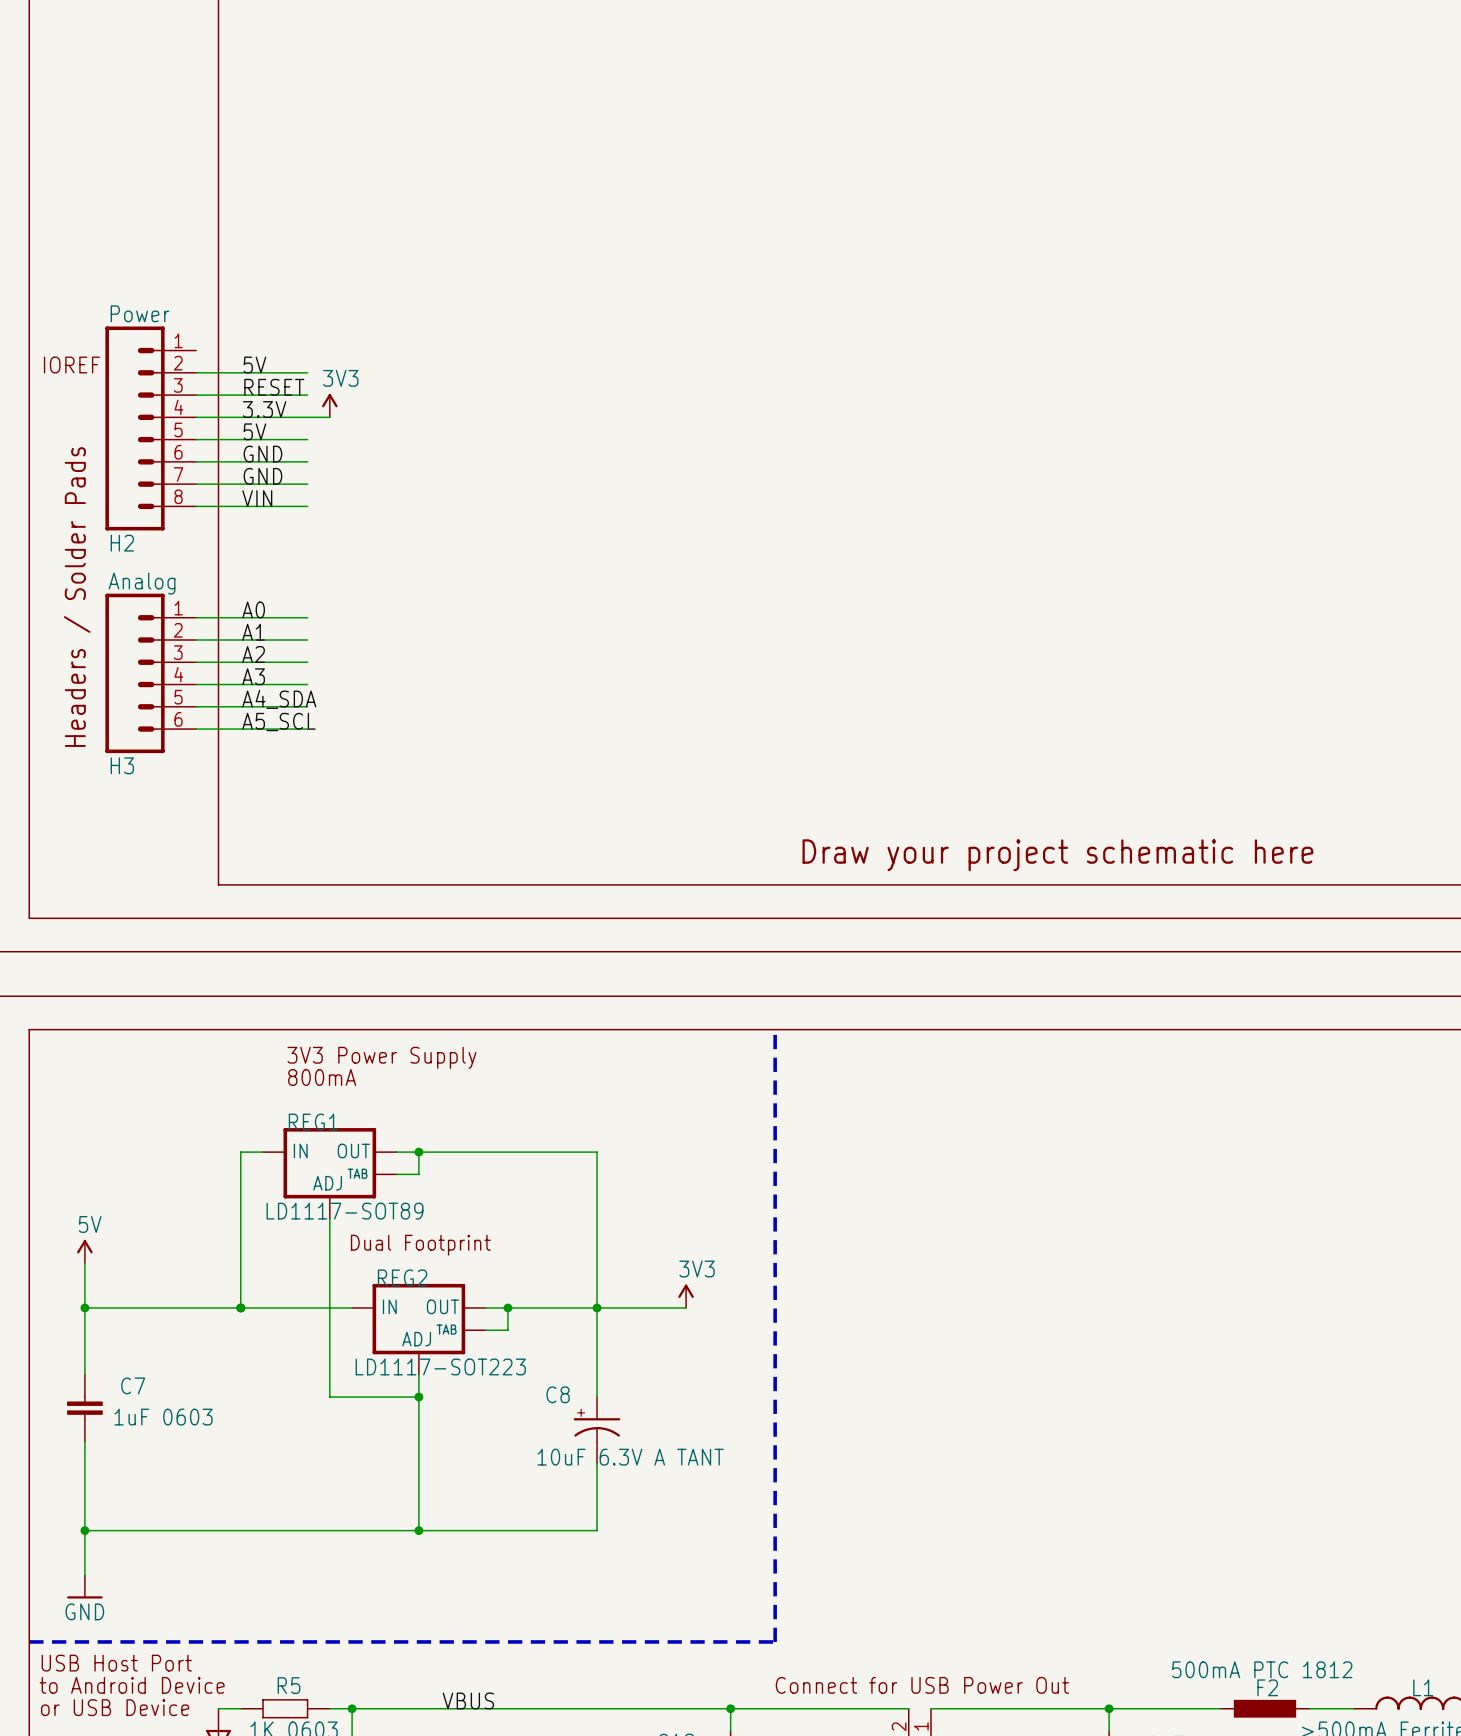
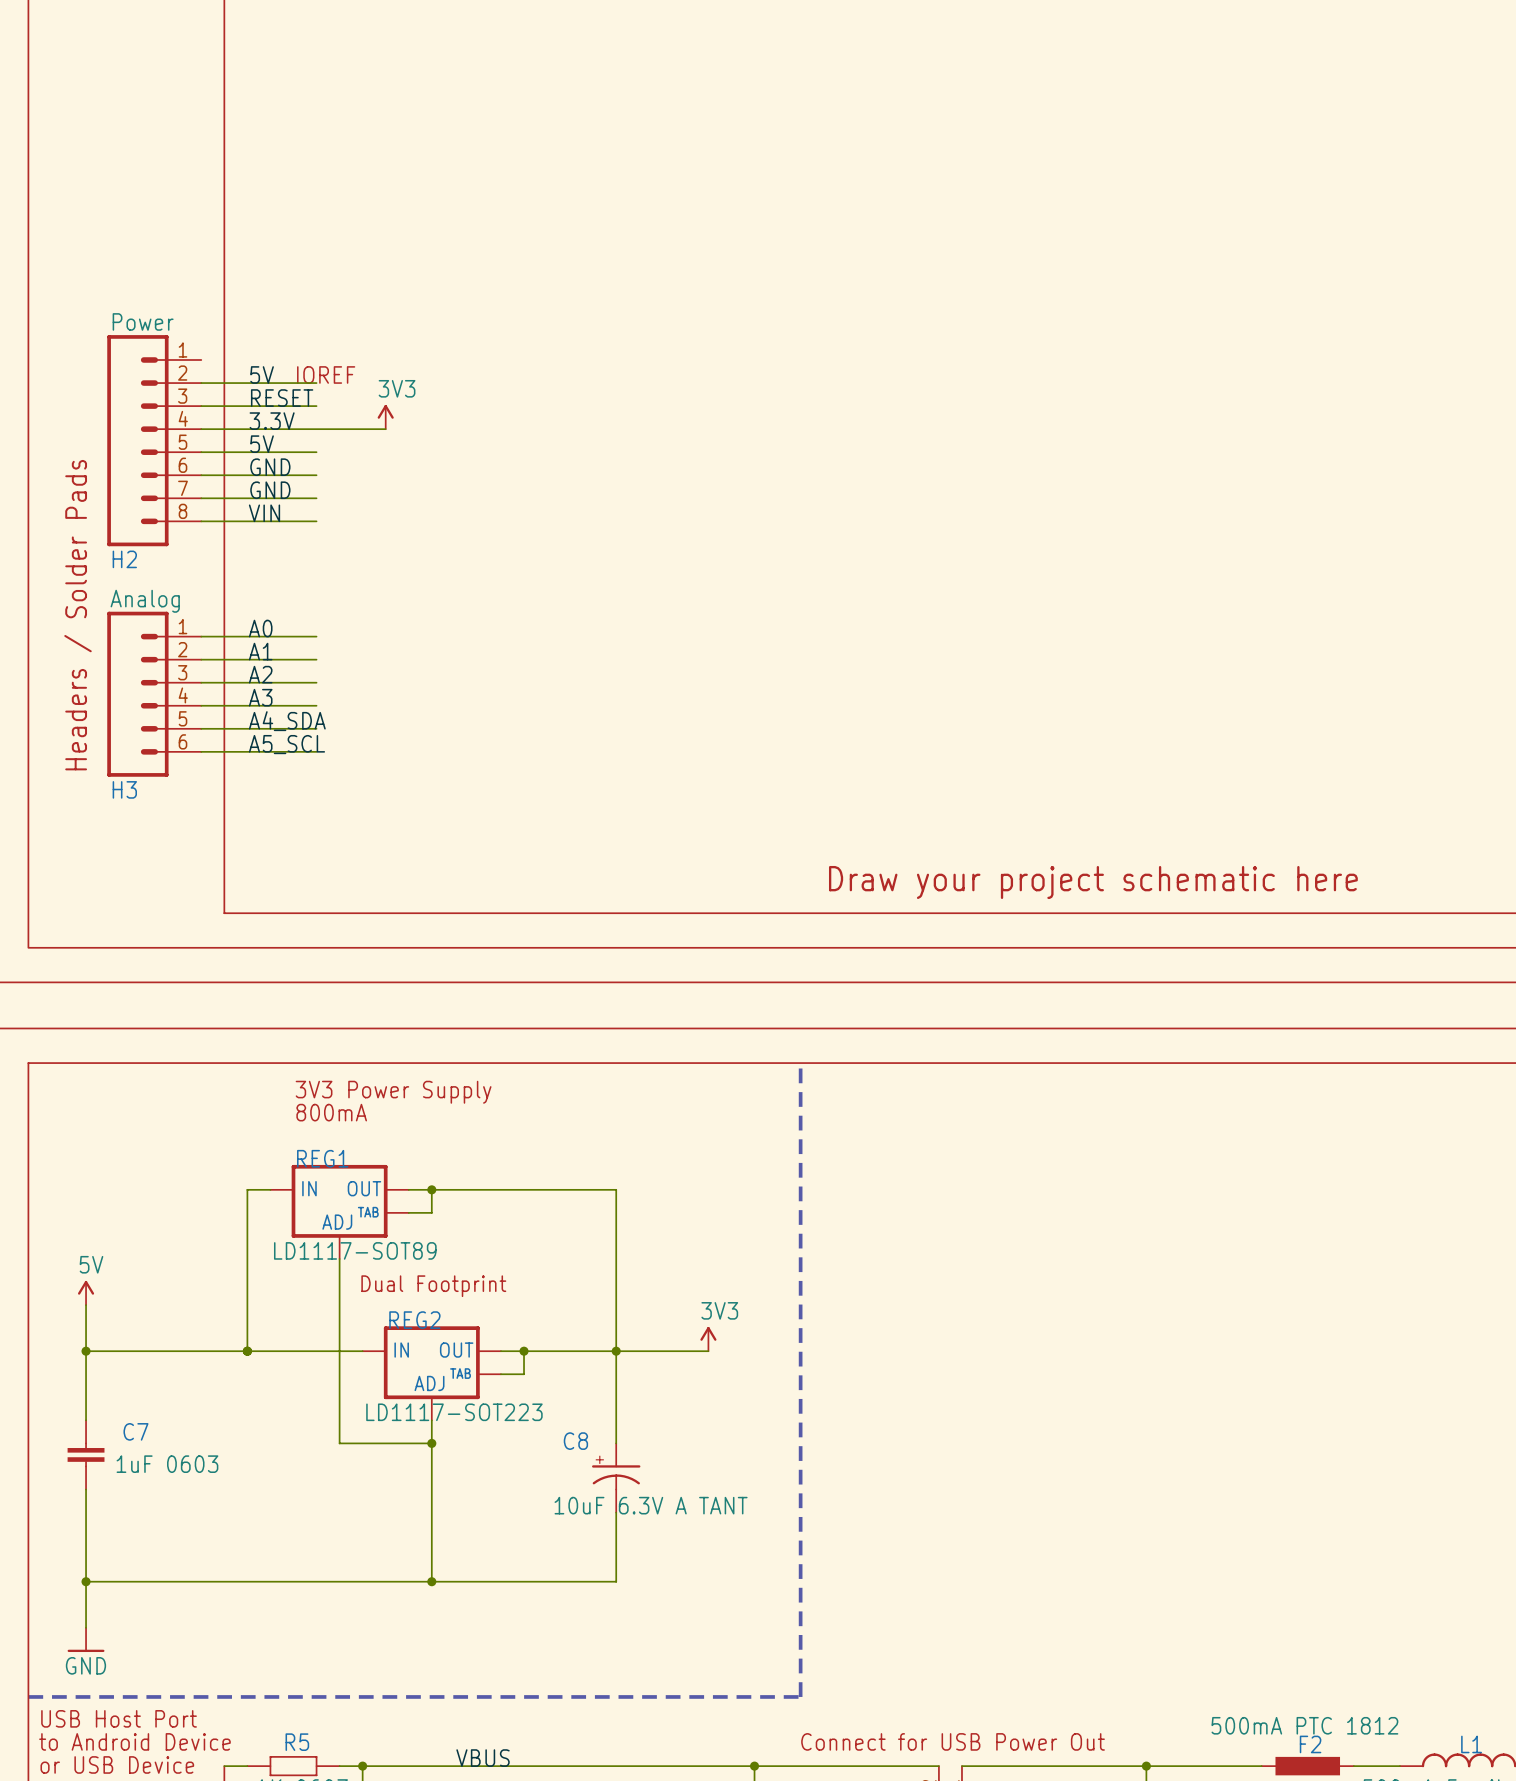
text: IOREF (71, 365) -> none
text: none -> IOREF (326, 374)
power symbol position: 3V3 (329, 405) -> 3V3 (385, 417)
wire: none -> (339, 429) (385, 429)

